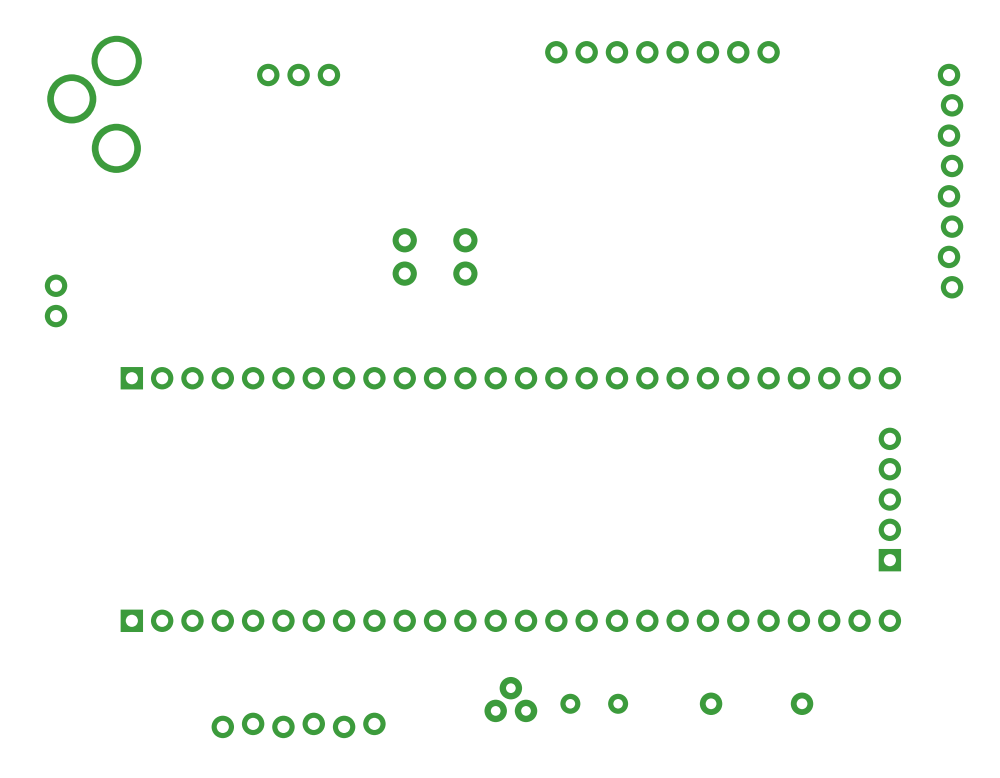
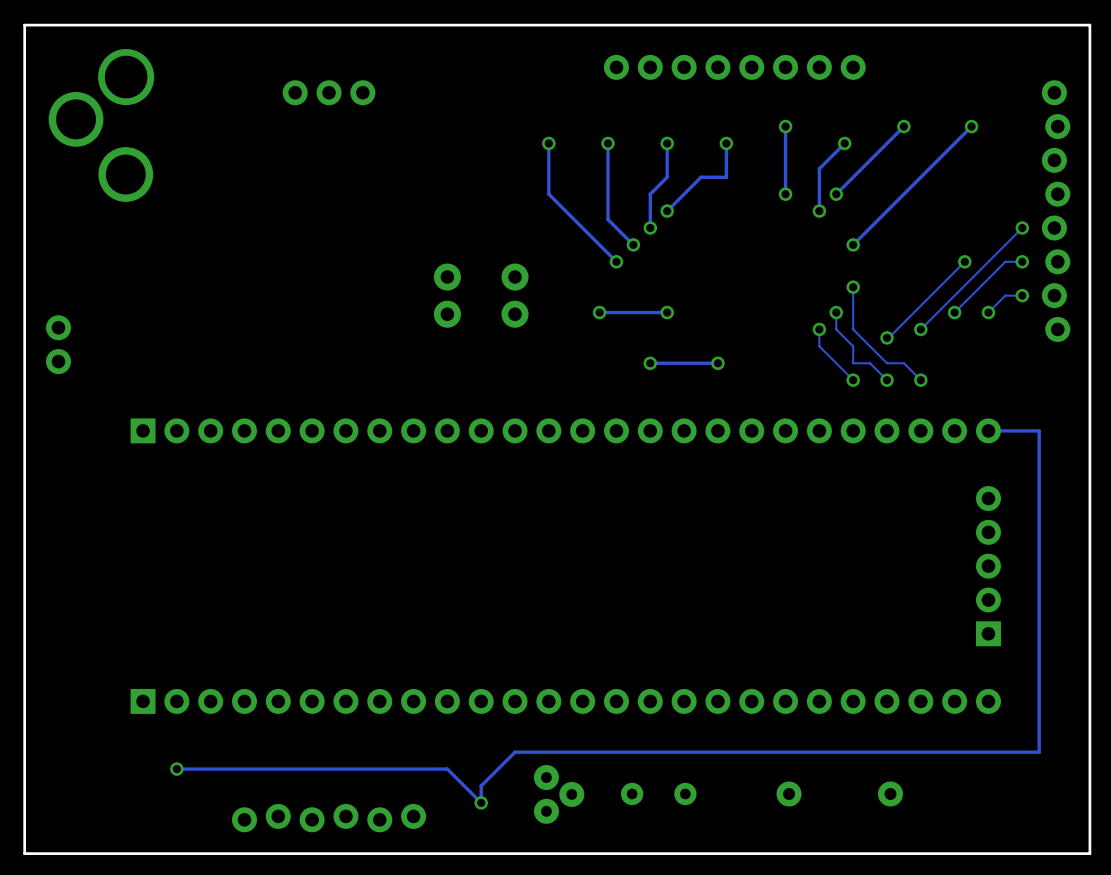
board edge: none -> (1089, 25) (24, 25) (24, 853) (1089, 853) (1089, 25)
track: none -> (785, 126) (785, 194)
via: none -> (785, 126)
track: none -> (903, 126) (836, 194)
via: none -> (903, 126)
track: none -> (971, 126) (853, 244)
via: none -> (971, 126)
track: none -> (548, 143) (548, 194) (616, 261)
via: none -> (548, 143)
track: none -> (608, 143) (608, 219) (633, 244)
via: none -> (608, 143)
track: none -> (667, 143) (667, 177) (650, 194) (650, 228)
via: none -> (667, 143)
track: none -> (726, 143) (726, 177) (701, 177) (667, 211)
via: none -> (726, 143)
track: none -> (844, 143) (819, 168) (819, 211)
via: none -> (844, 143)
via: none -> (785, 194)
via: none -> (836, 194)
via: none -> (667, 211)
via: none -> (819, 211)
via: none -> (650, 228)
track: none -> (1022, 228) (920, 329)
via: none -> (1022, 228)
via: none -> (633, 244)
via: none -> (853, 244)
via: none -> (616, 261)
track: none -> (964, 261) (887, 337)
via: none -> (964, 261)
track: none -> (1022, 261) (1005, 261) (954, 312)
via: none -> (1022, 261)
track: none -> (853, 287) (853, 329) (887, 363) (903, 363) (920, 380)
via: none -> (853, 287)
track: none -> (1022, 295) (1005, 295) (988, 312)
via: none -> (1022, 295)
via: none -> (599, 312)
track: none -> (667, 312) (599, 312)
via: none -> (667, 312)
track: none -> (836, 312) (836, 329) (853, 346) (853, 363) (870, 363) (887, 380)
via: none -> (836, 312)
via: none -> (954, 312)
via: none -> (988, 312)
track: none -> (819, 329) (819, 346) (853, 380)
via: none -> (819, 329)
via: none -> (920, 329)
via: none -> (887, 337)
via: none -> (650, 363)
track: none -> (717, 363) (650, 363)
via: none -> (717, 363)
via: none -> (853, 380)
via: none -> (887, 380)
via: none -> (920, 380)
track: none -> (988, 430) (1039, 430) (1039, 752) (515, 752) (481, 785) (481, 802) (447, 769) (176, 769)
via: none -> (176, 769)
part rotation: 0° (510, 699) -> 90° clockwise (559, 794)
via: none -> (481, 802)

